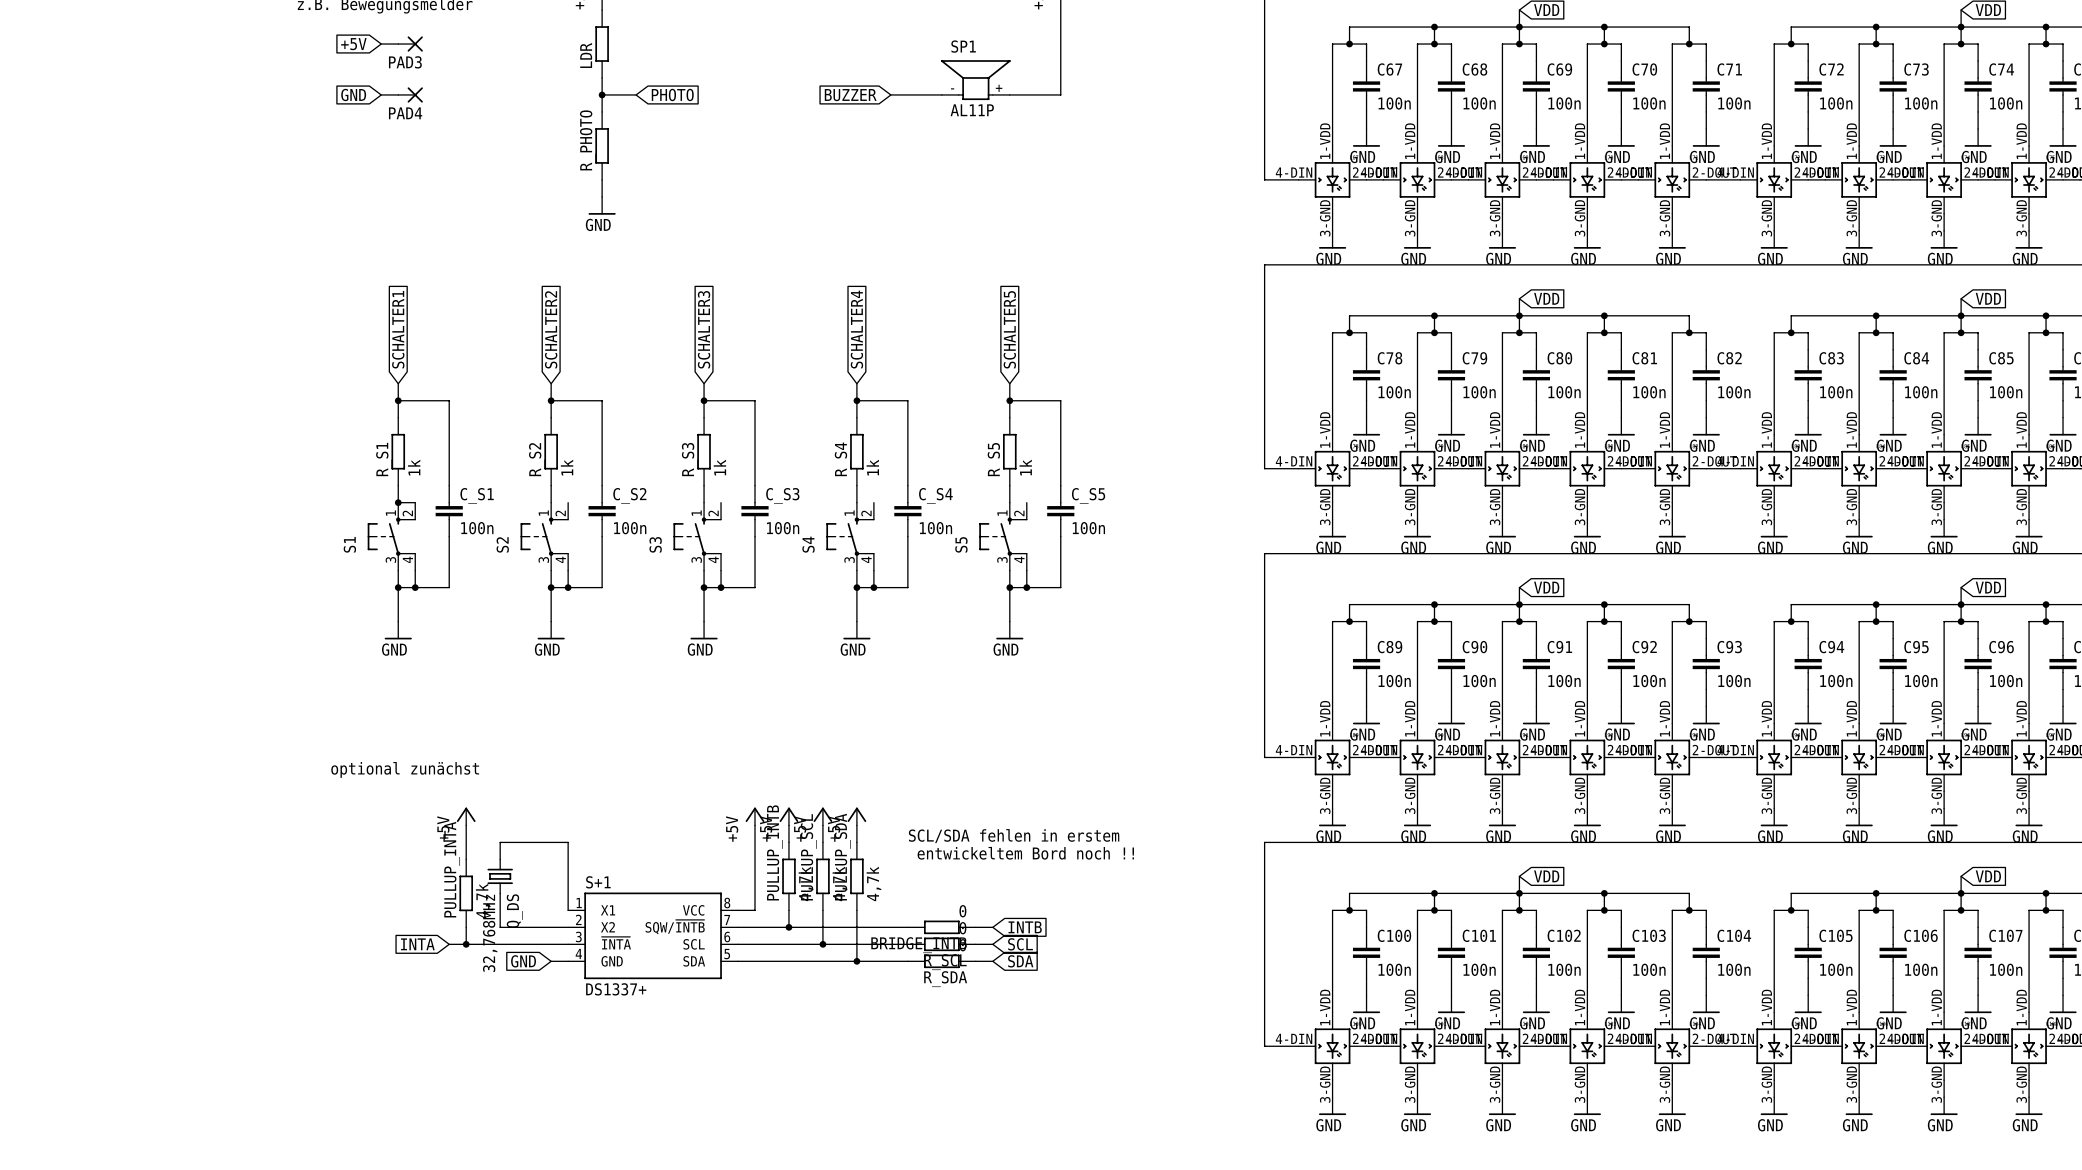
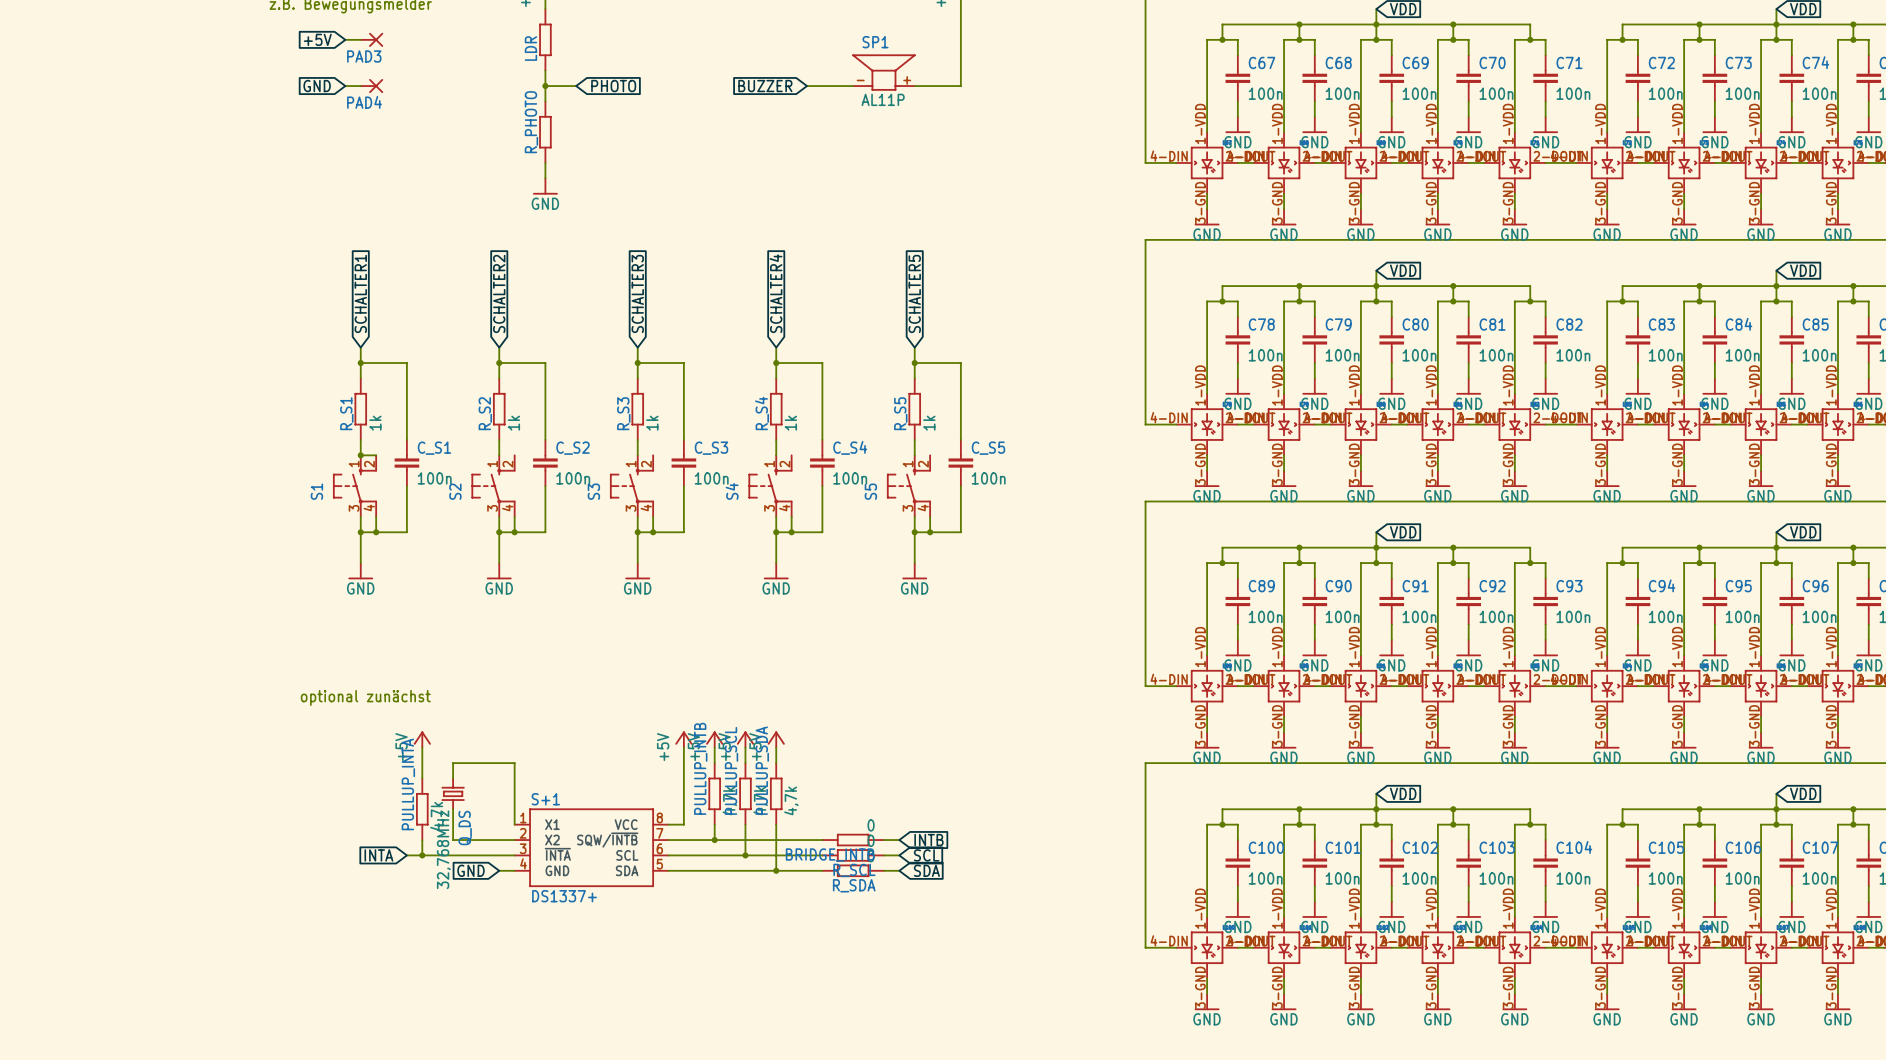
text: SCL/SDA fehlen in erstem (1014, 836) -> none
text: entwickeltem Bord noch !! (1025, 853) -> none

